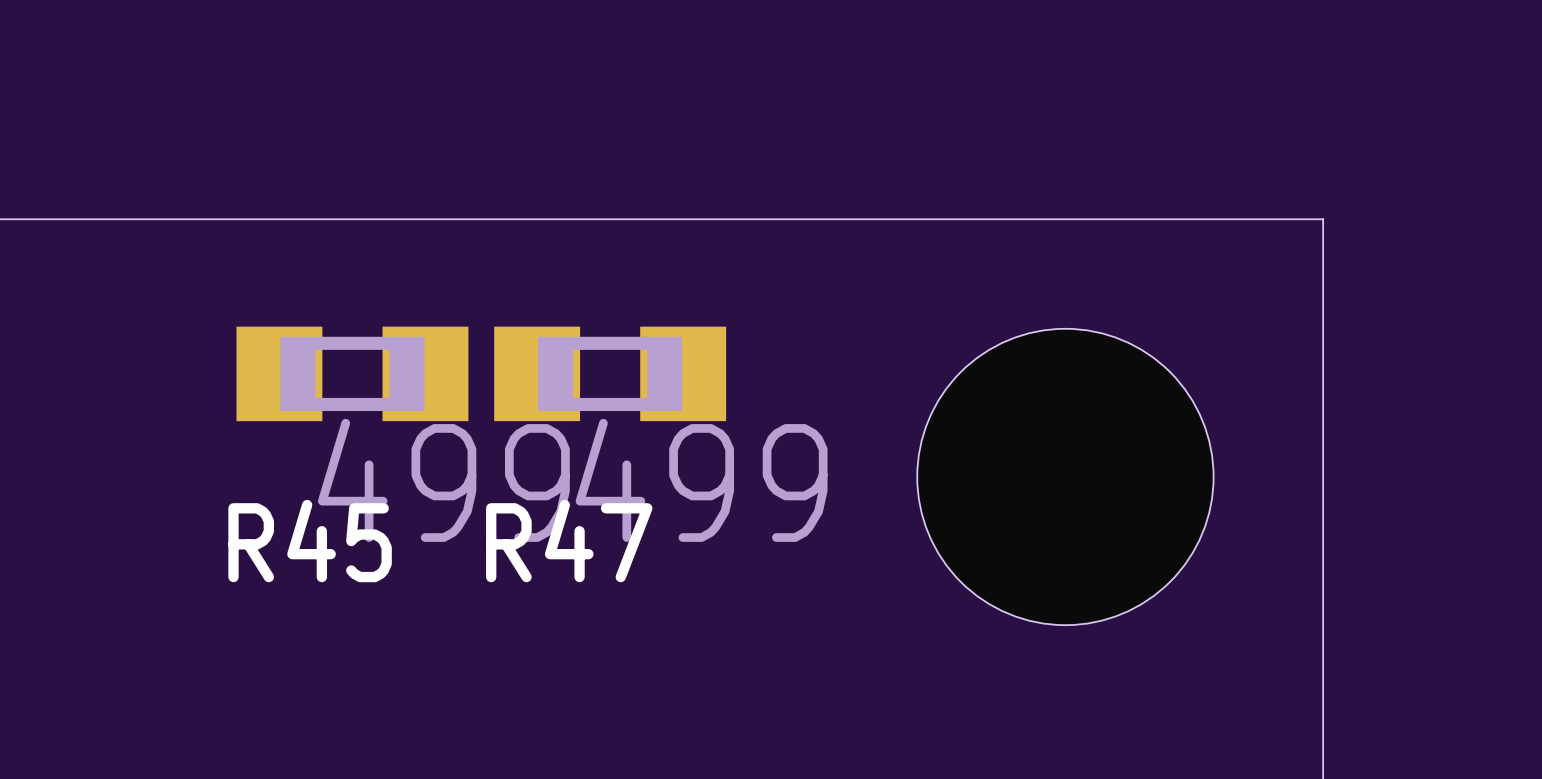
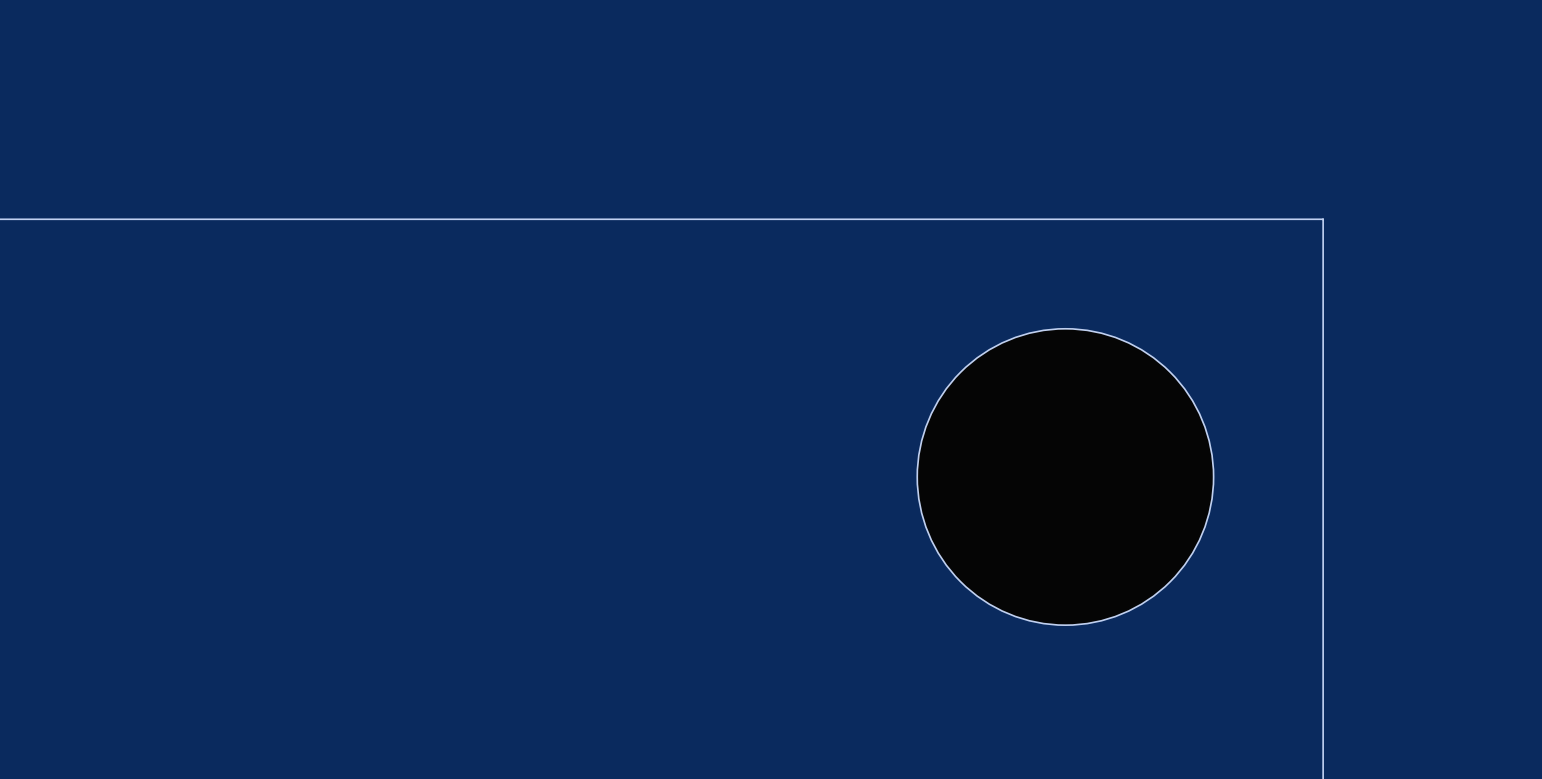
R45: 499 (352, 373) -> none
R47: 499 (610, 373) -> none

